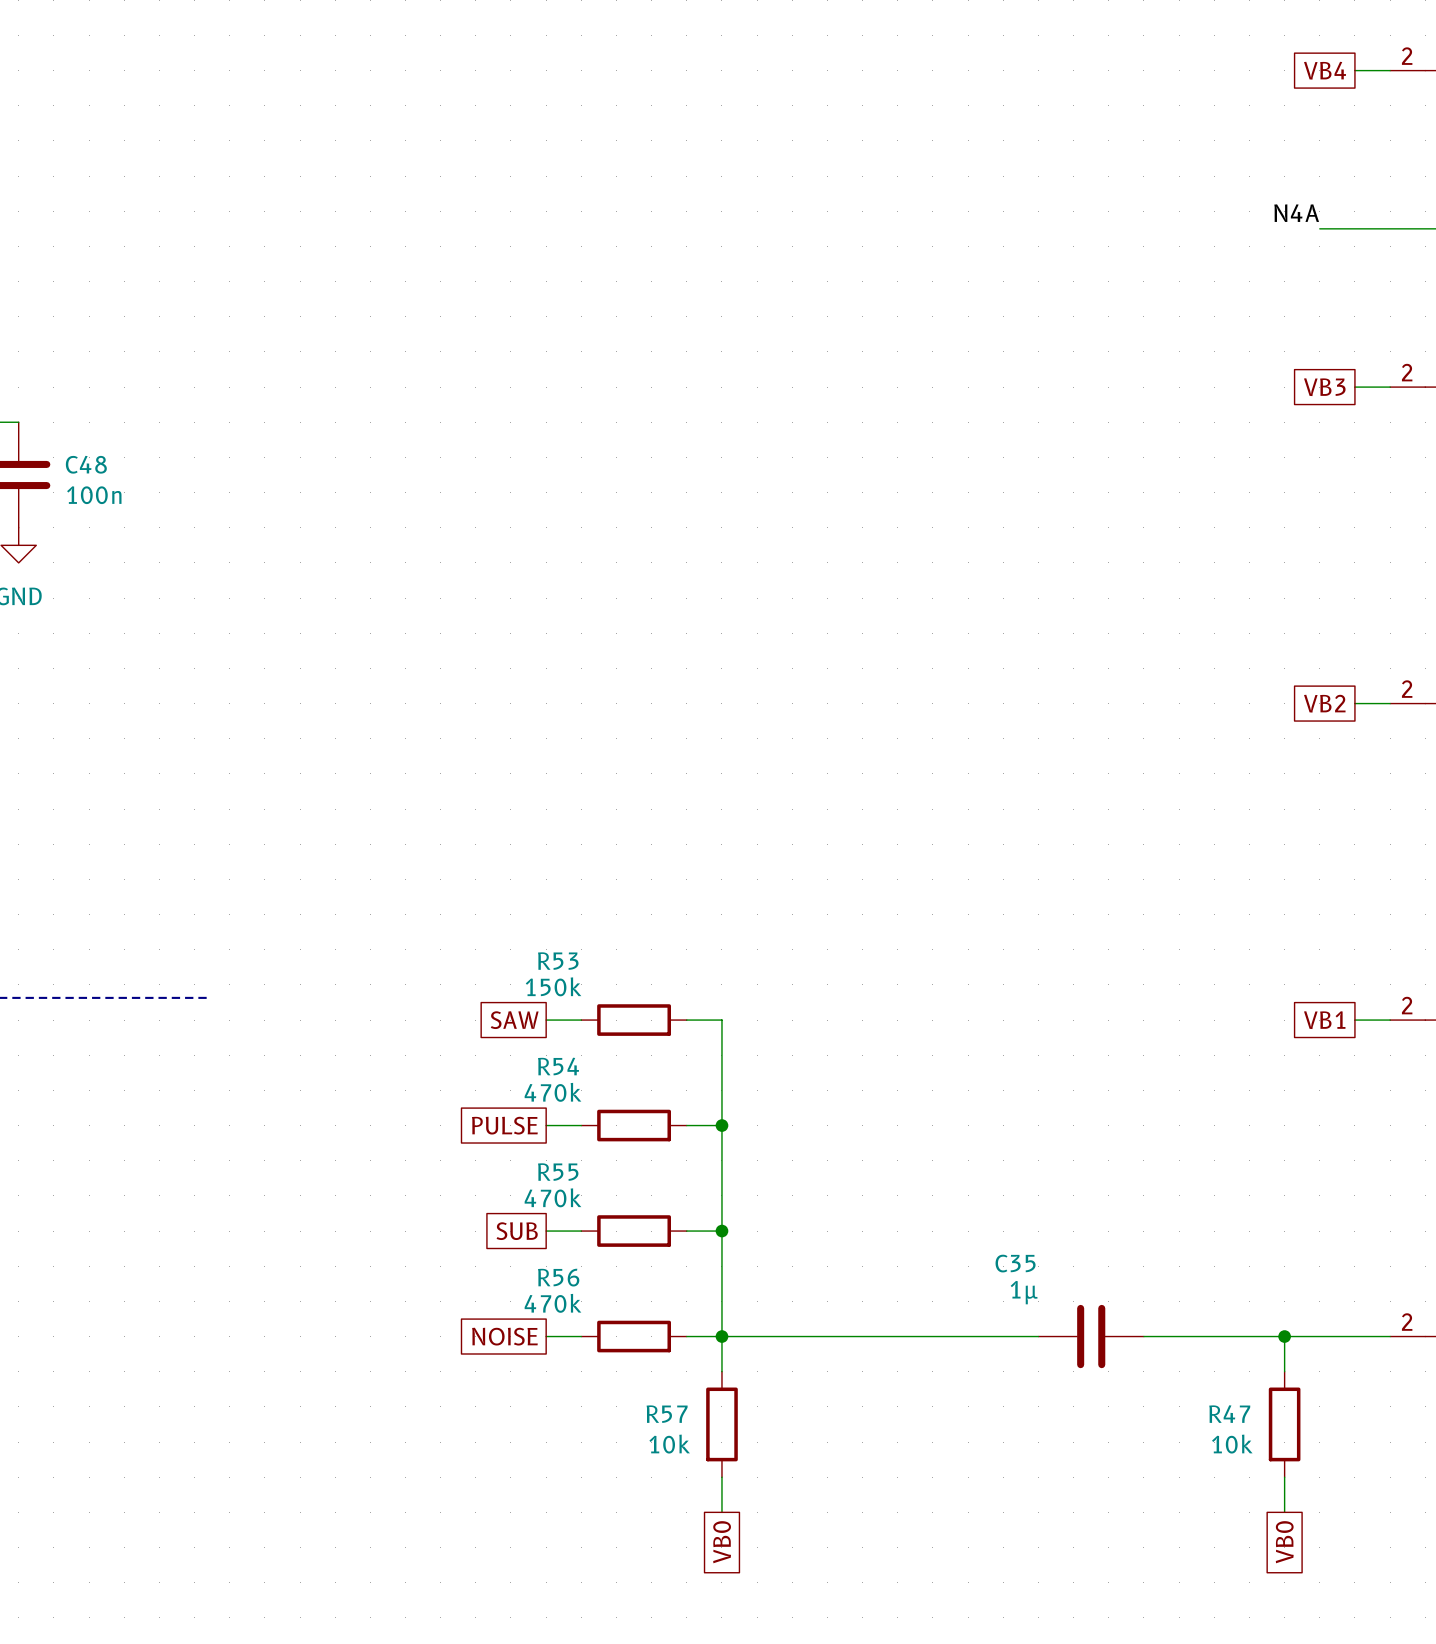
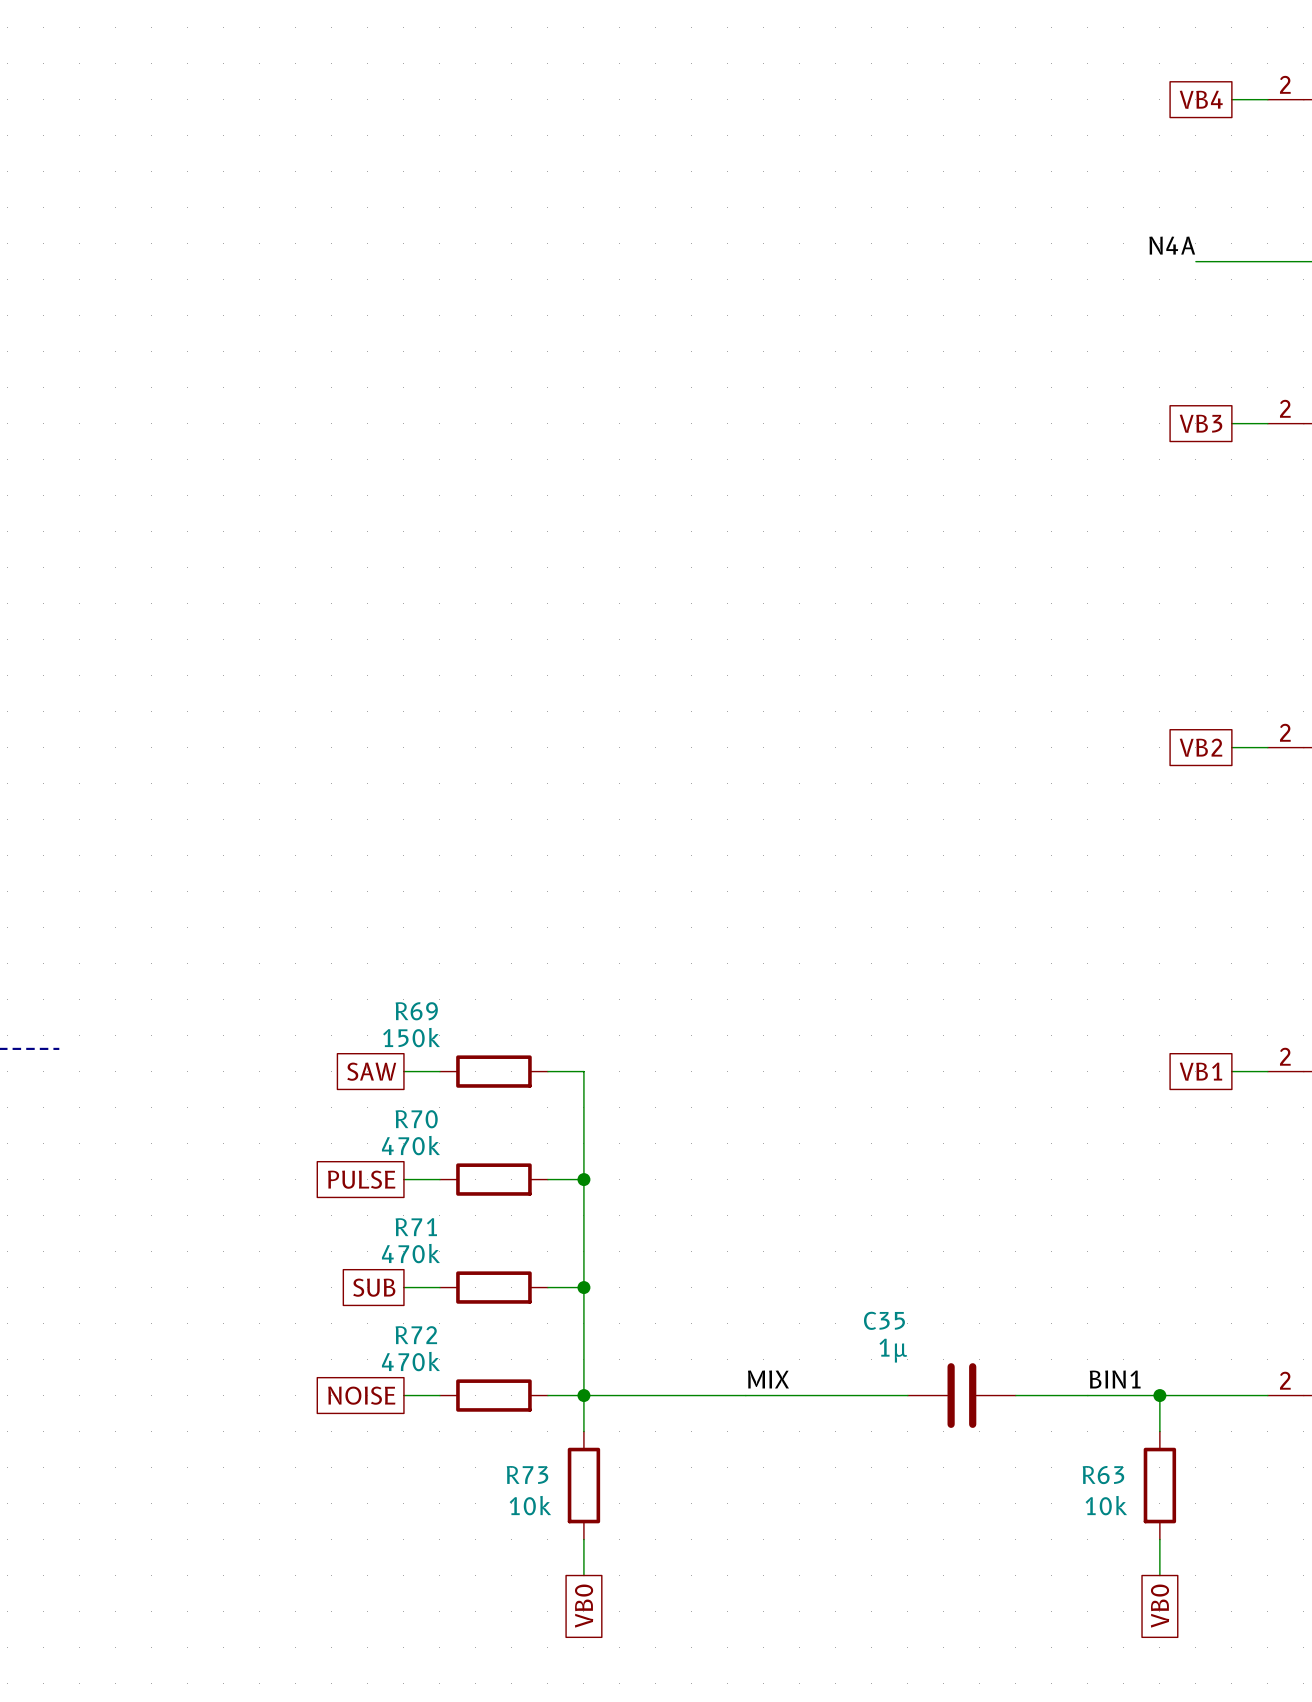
R53 name: R53 (558, 961) -> R69 (416, 1011)
R54 name: R54 (558, 1066) -> R70 (416, 1119)
R55 name: R55 (558, 1172) -> R71 (416, 1227)
R56 name: R56 (558, 1277) -> R72 (416, 1335)
label: none -> MIX (768, 1379)
label: none -> BIN1 (1115, 1379)
R57 name: R57 (667, 1414) -> R73 (527, 1474)
R47 name: R47 (1229, 1414) -> R63 (1103, 1475)

